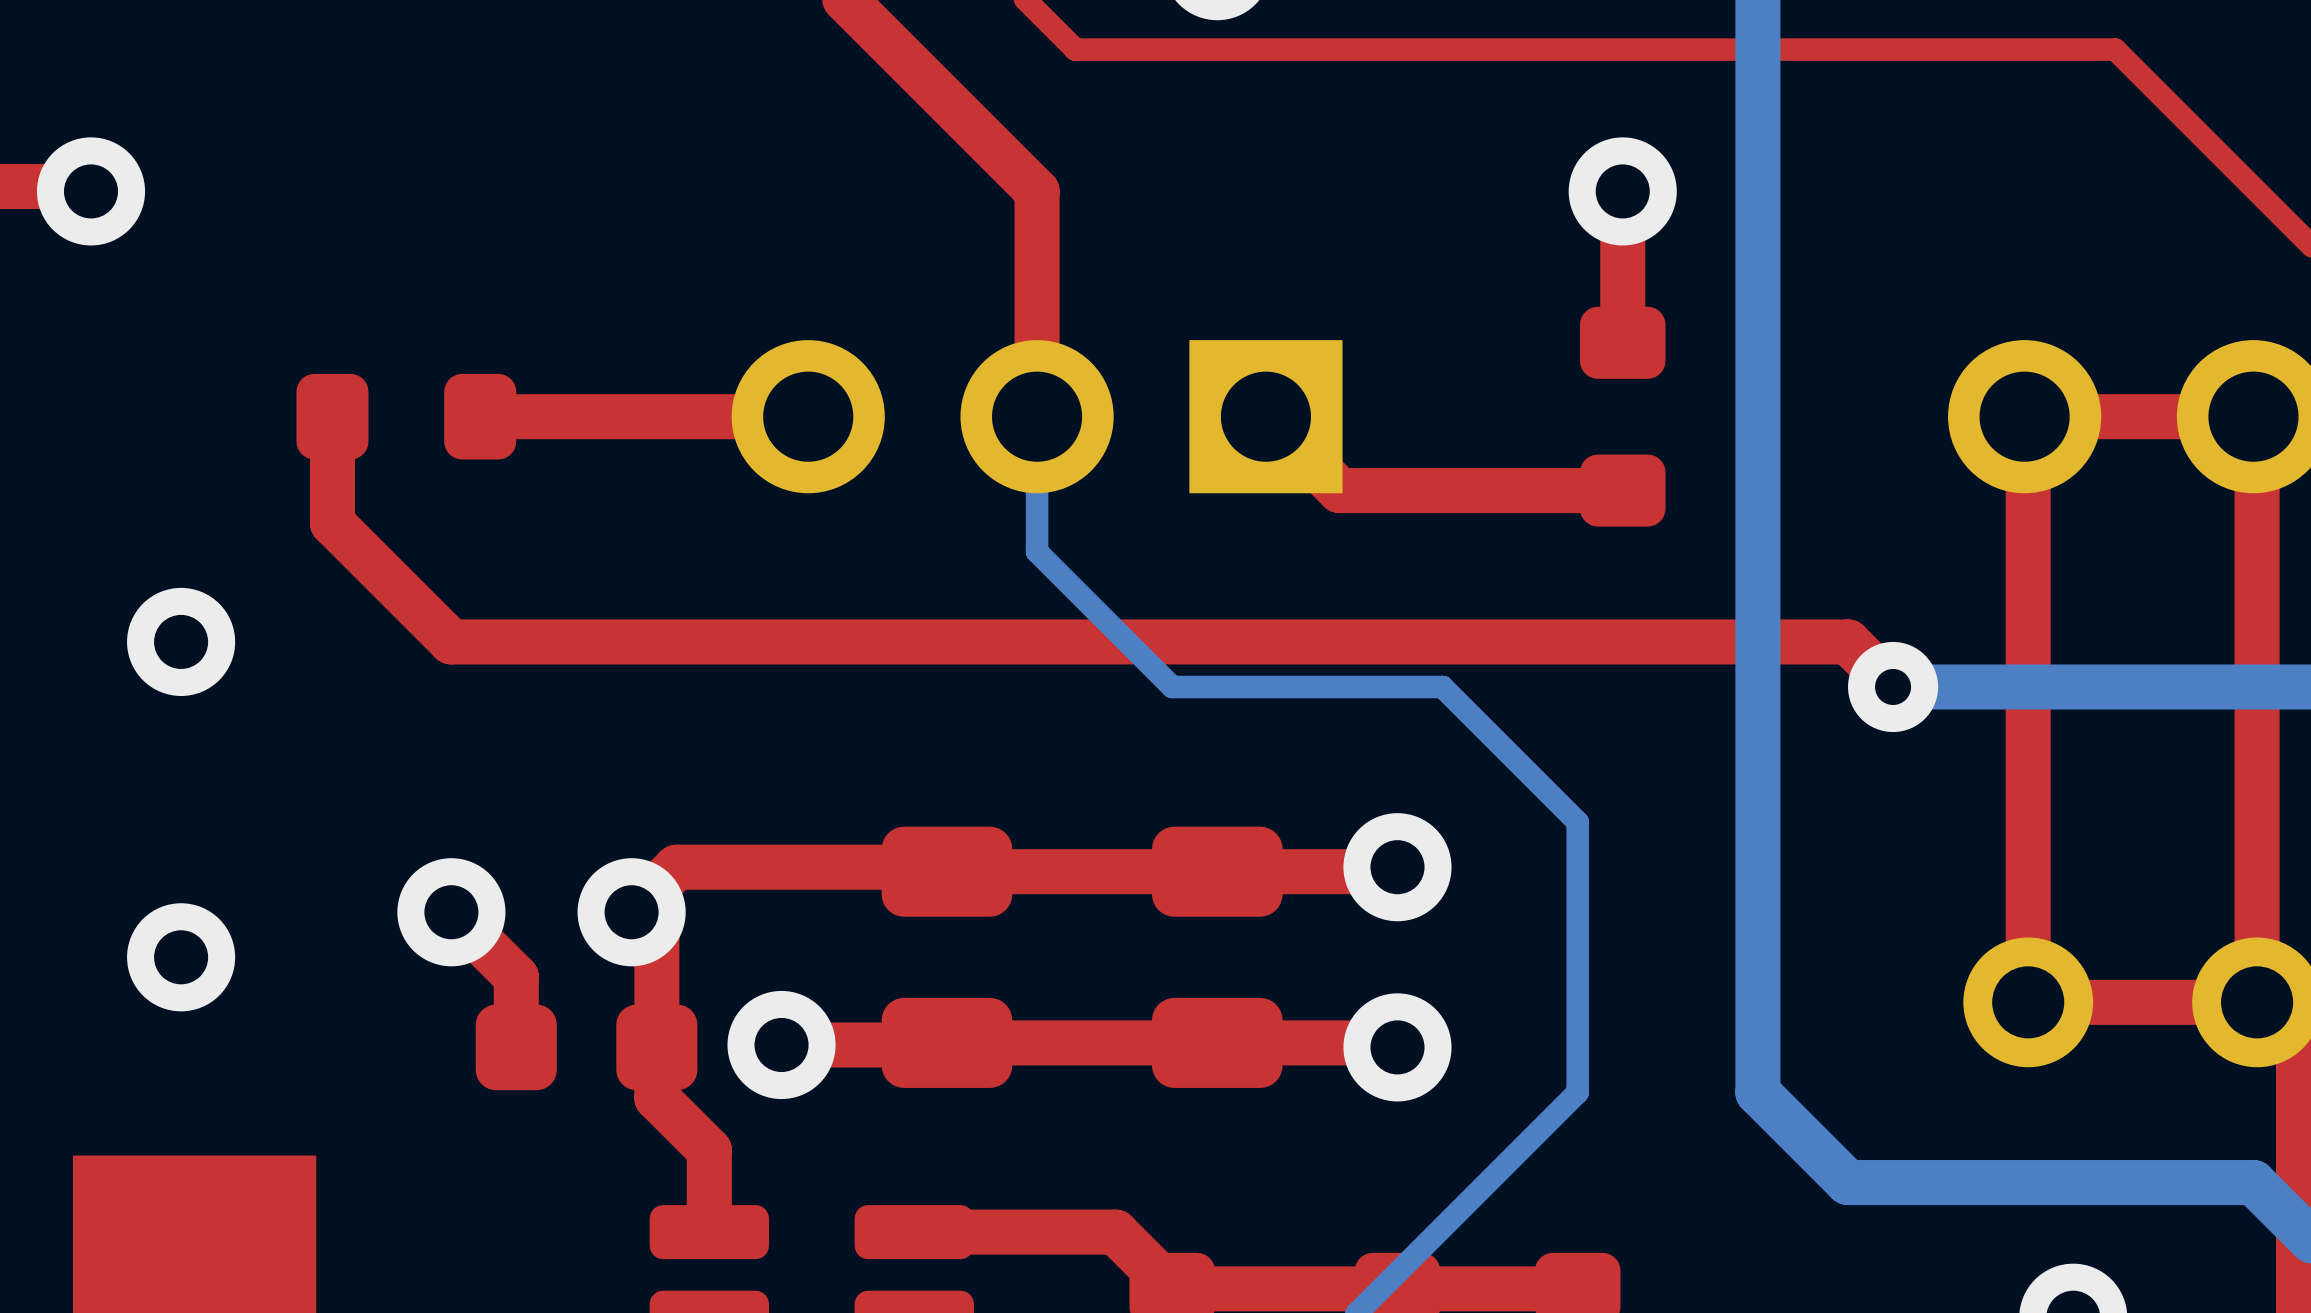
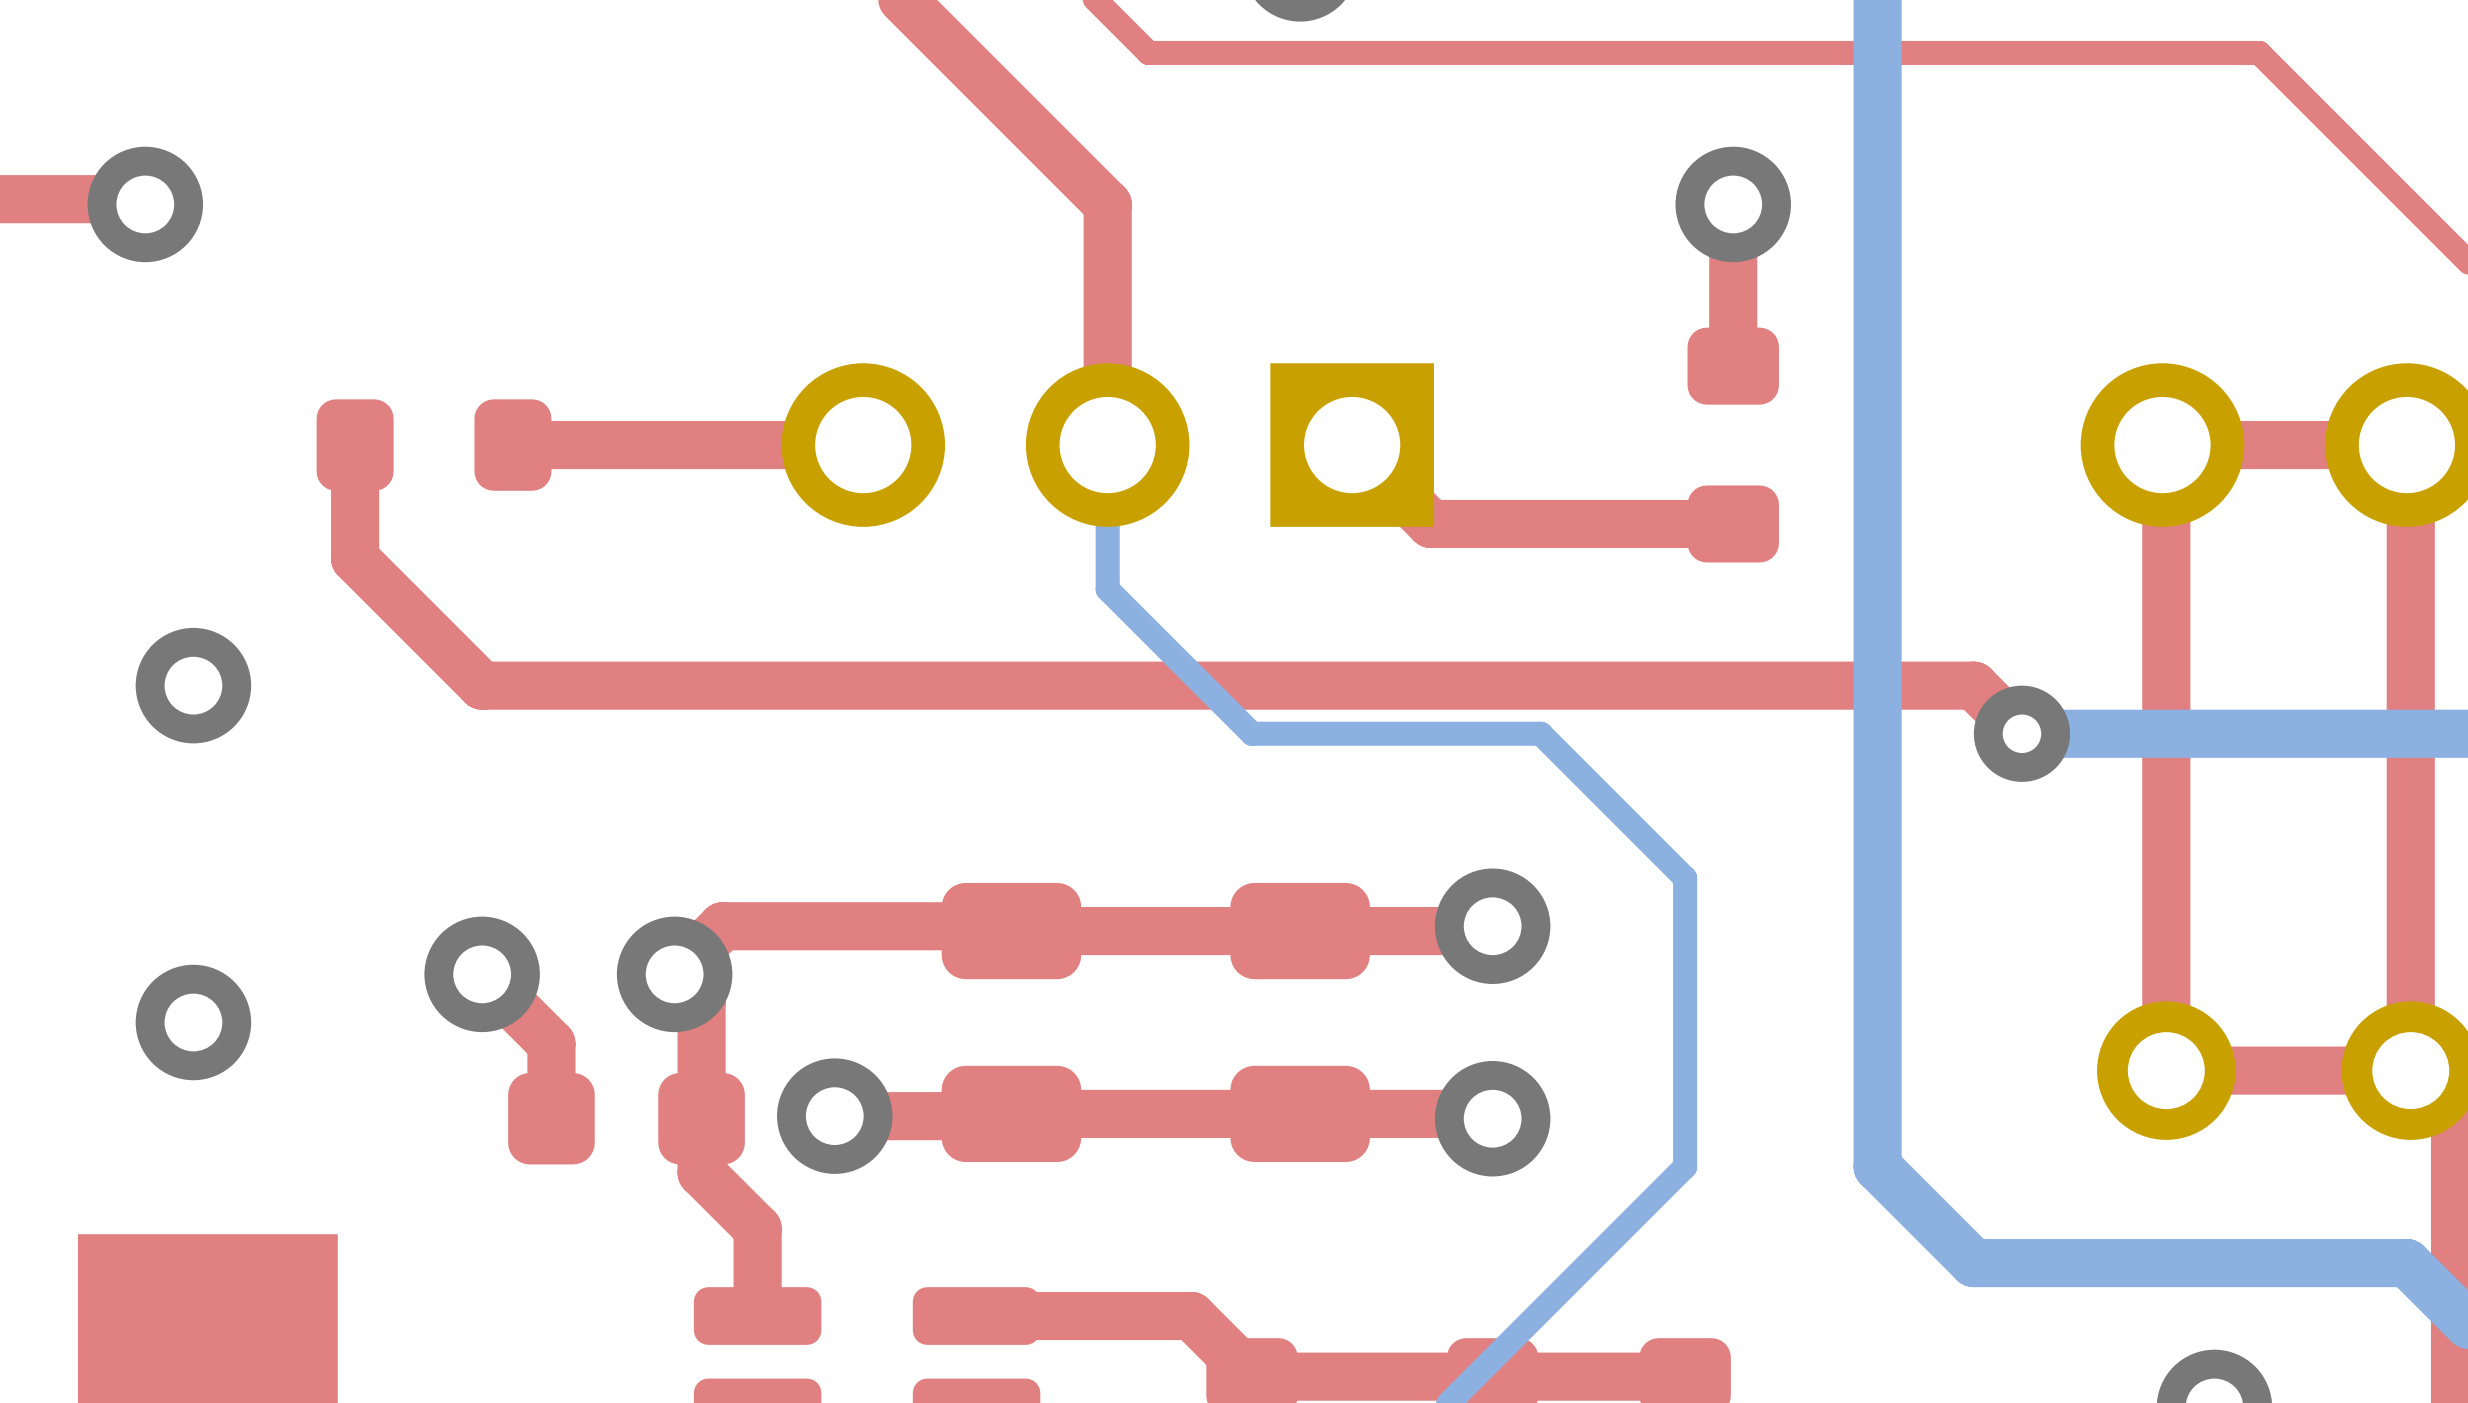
via position: (90, 191) -> (145, 204)

